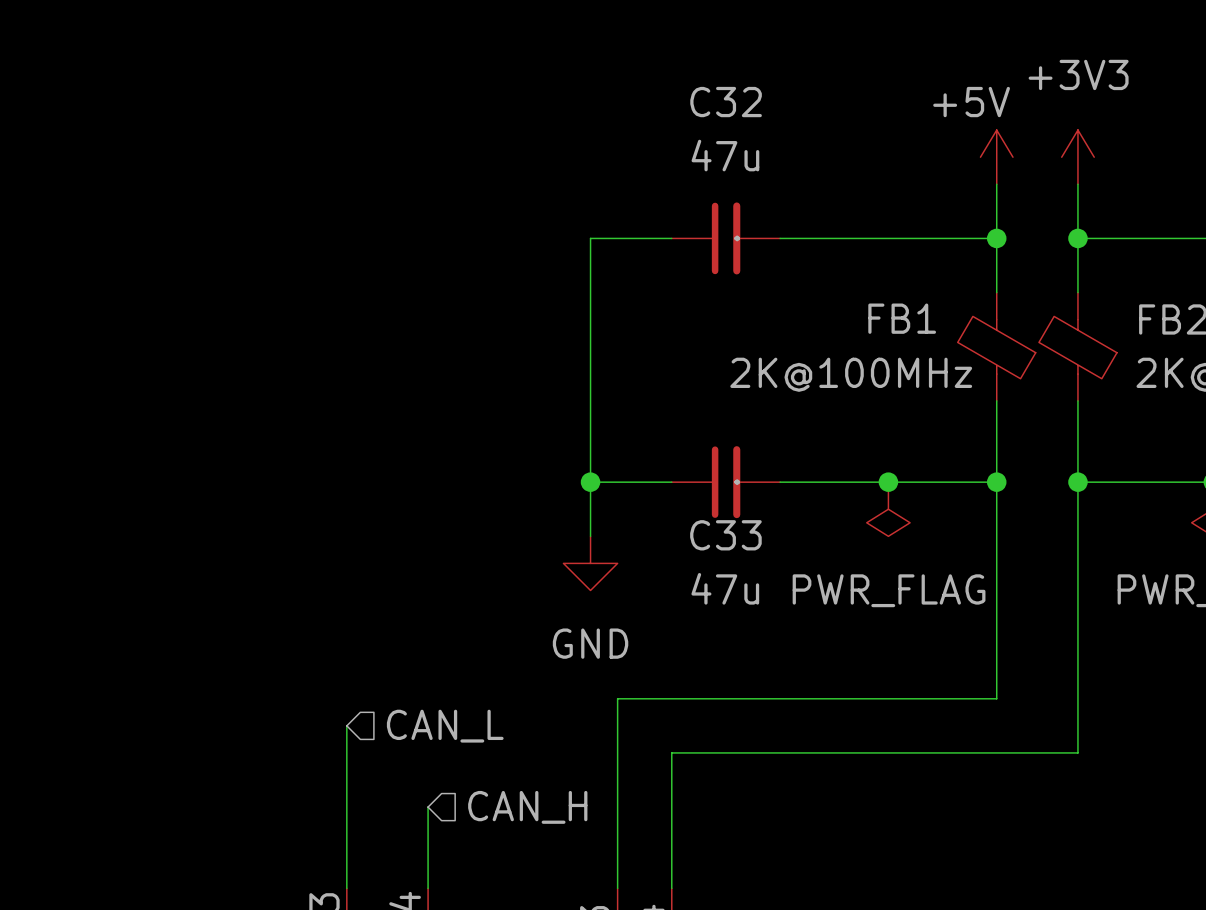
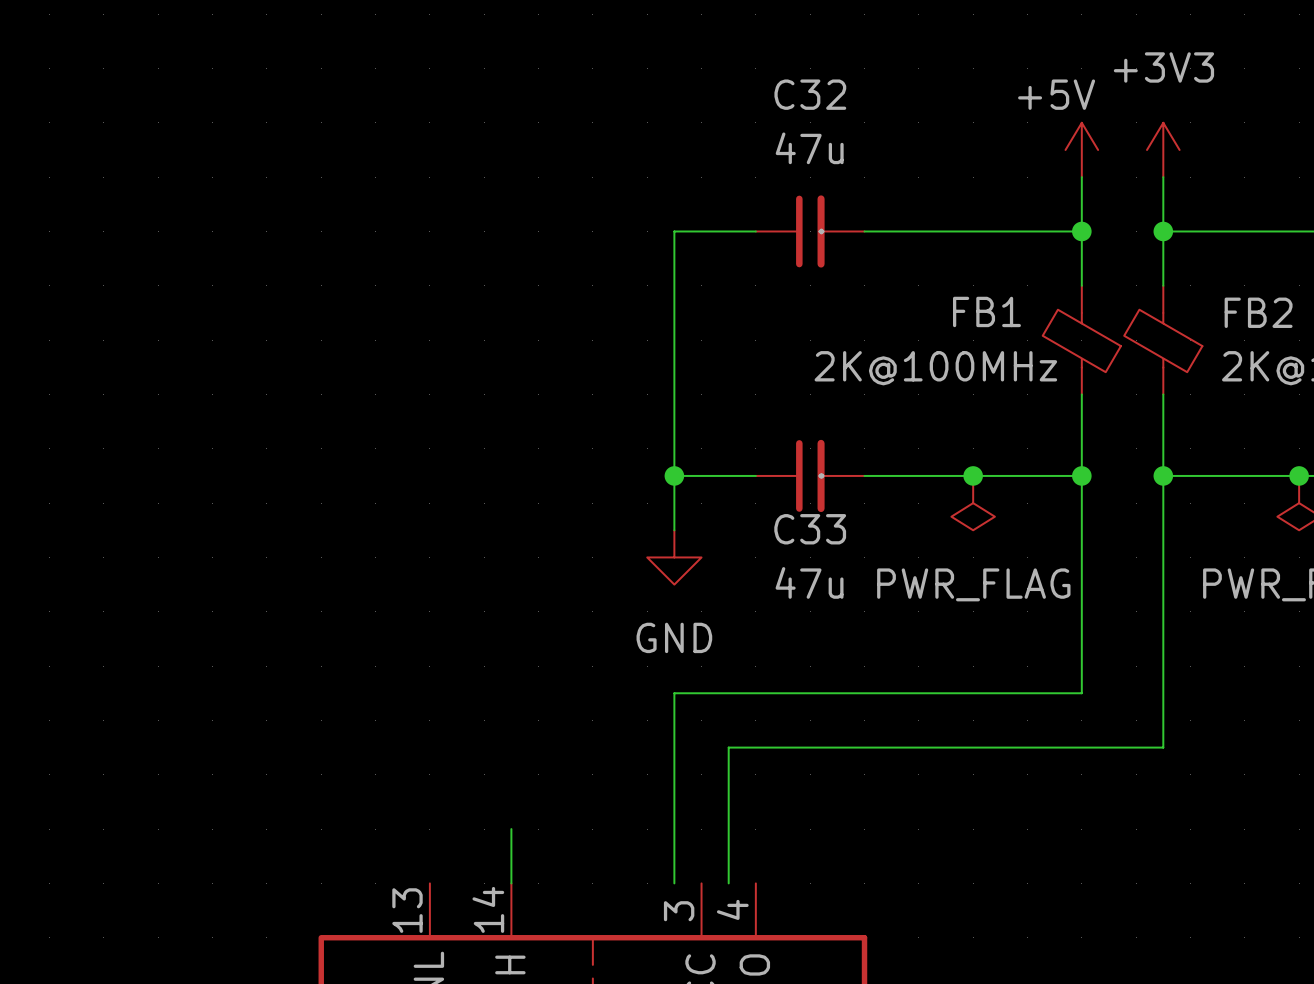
wire: (617, 698) (617, 888) -> (701, 693) (674, 693) (674, 883)
wire: (346, 725) (346, 888) -> none
hierarchical label: CAN_L (445, 726) -> none
wire: (671, 752) (671, 888) -> (755, 747) (728, 747) (728, 883)
wire: (428, 807) (428, 834) -> none
hierarchical label: CAN_H (527, 807) -> none

